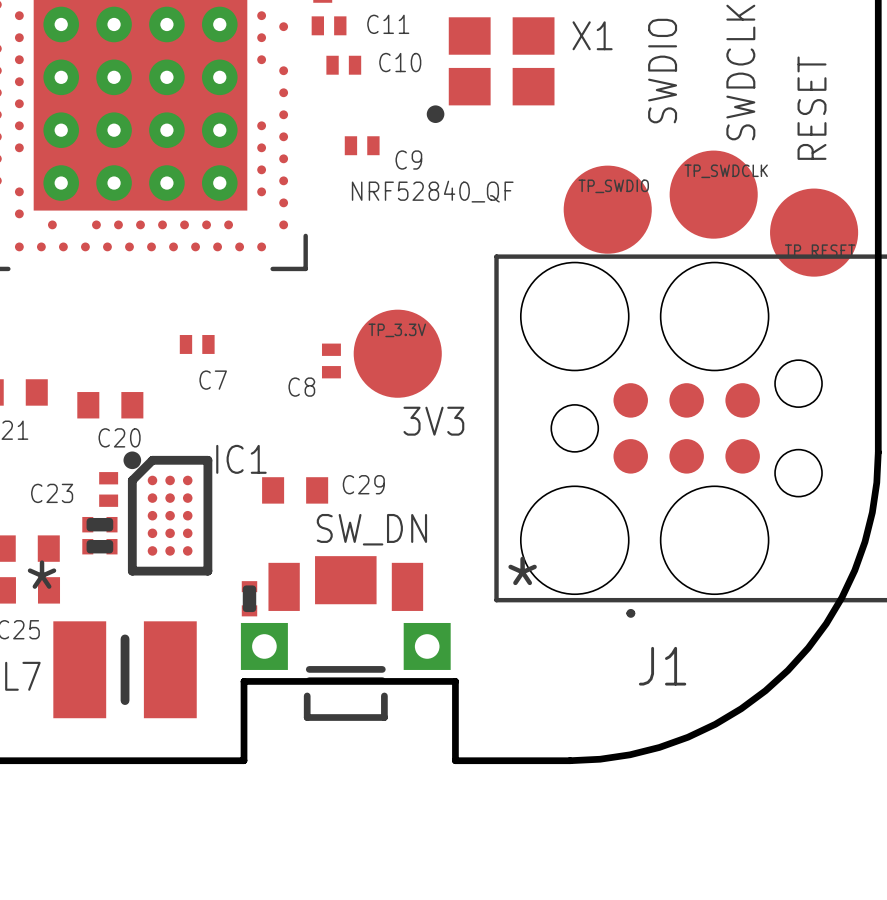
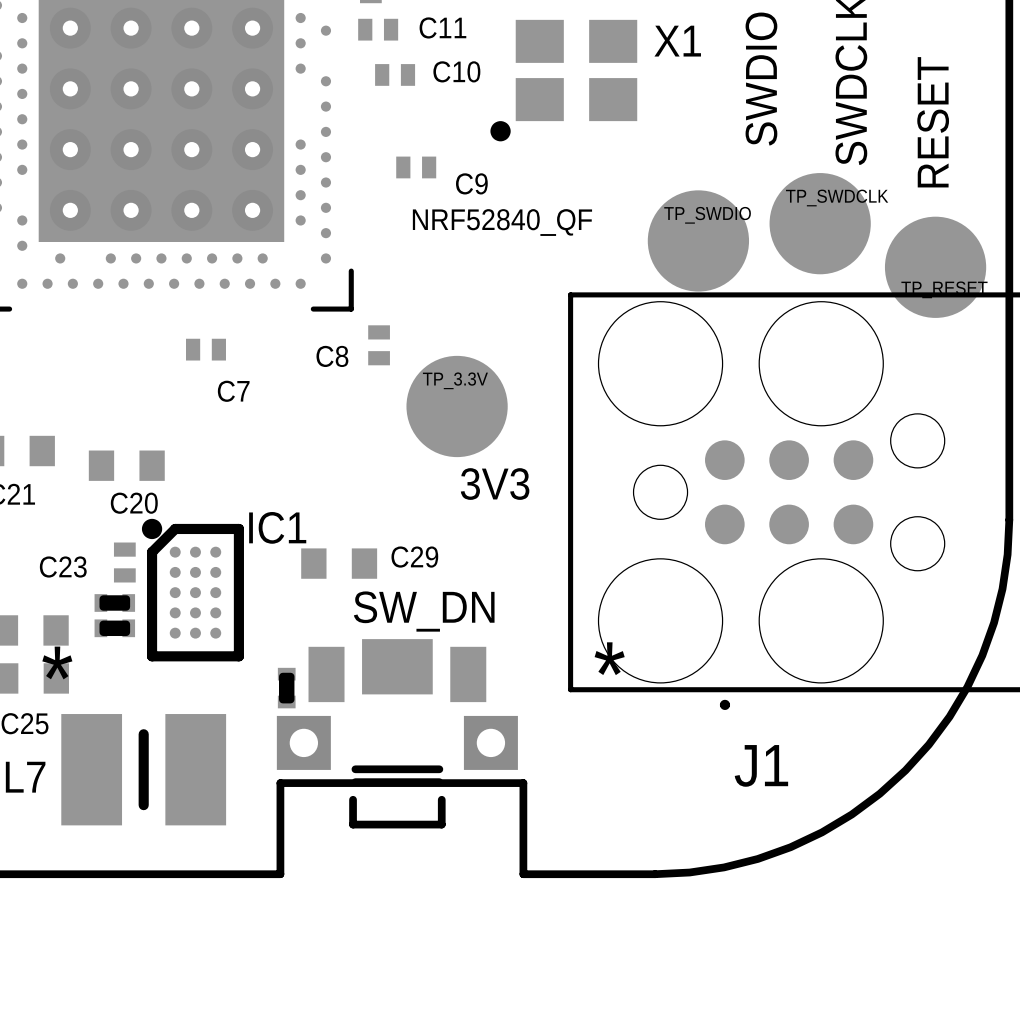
C7 position: (197, 344) -> (205, 349)
C8 position: (331, 360) -> (379, 345)
C7 name position: C7 (213, 380) -> C7 (233, 391)
C8 name position: C8 (301, 387) -> C8 (332, 356)

